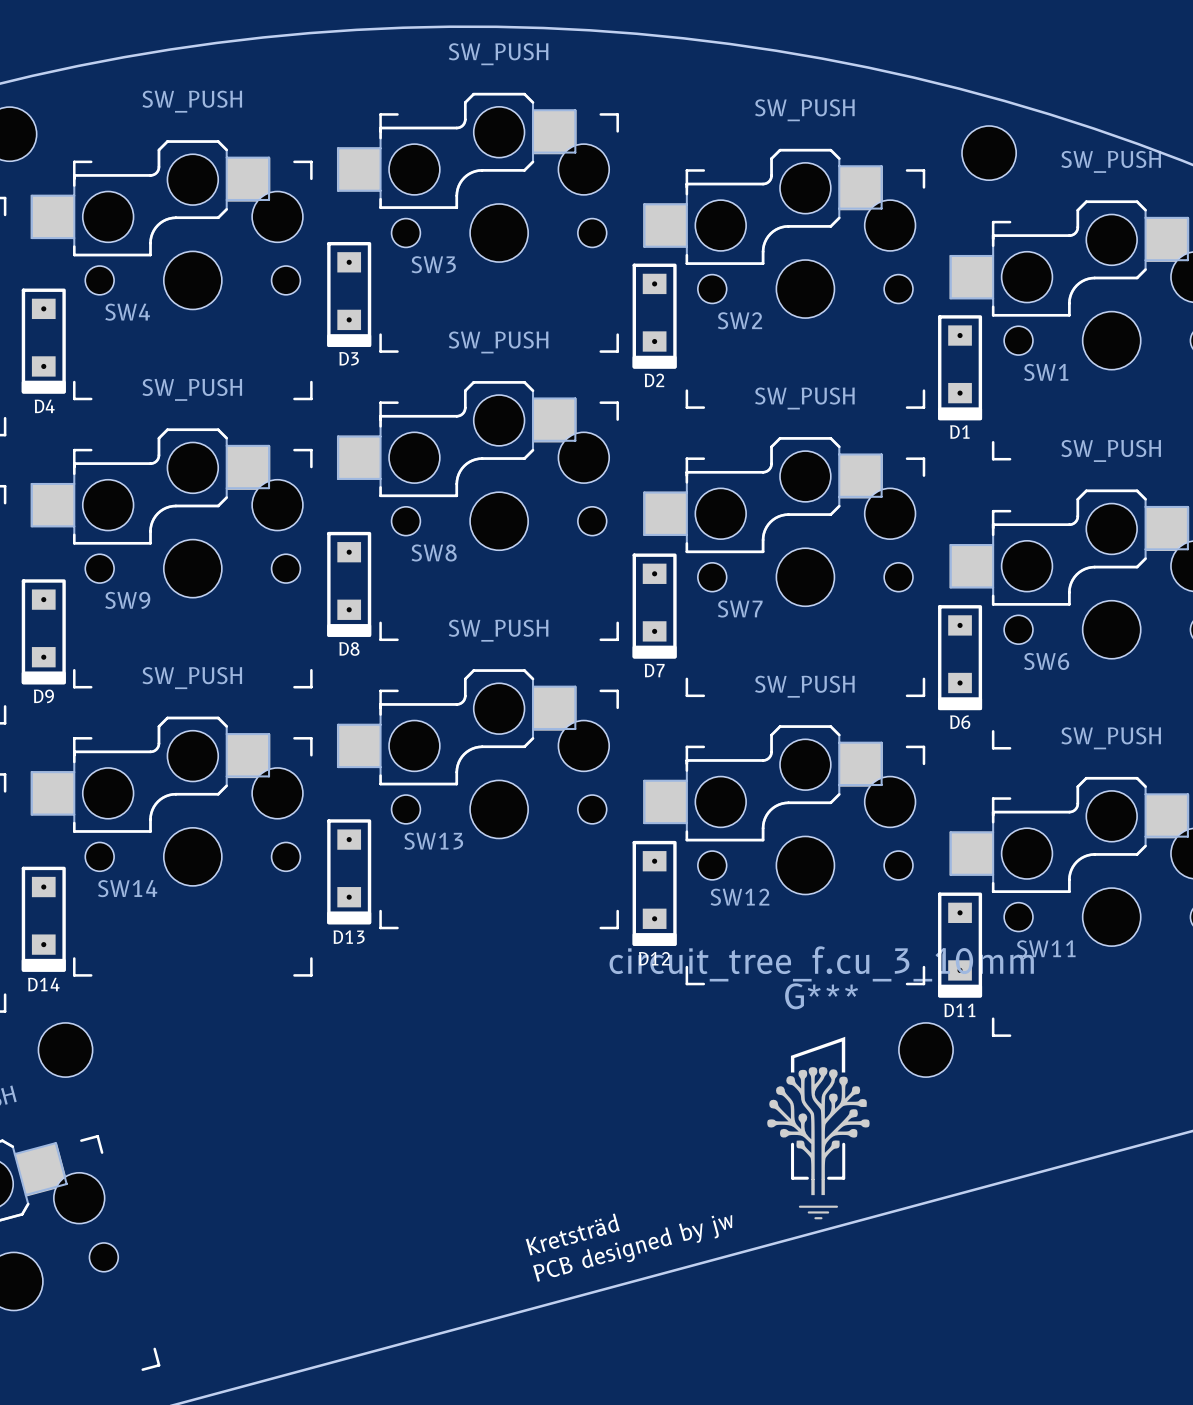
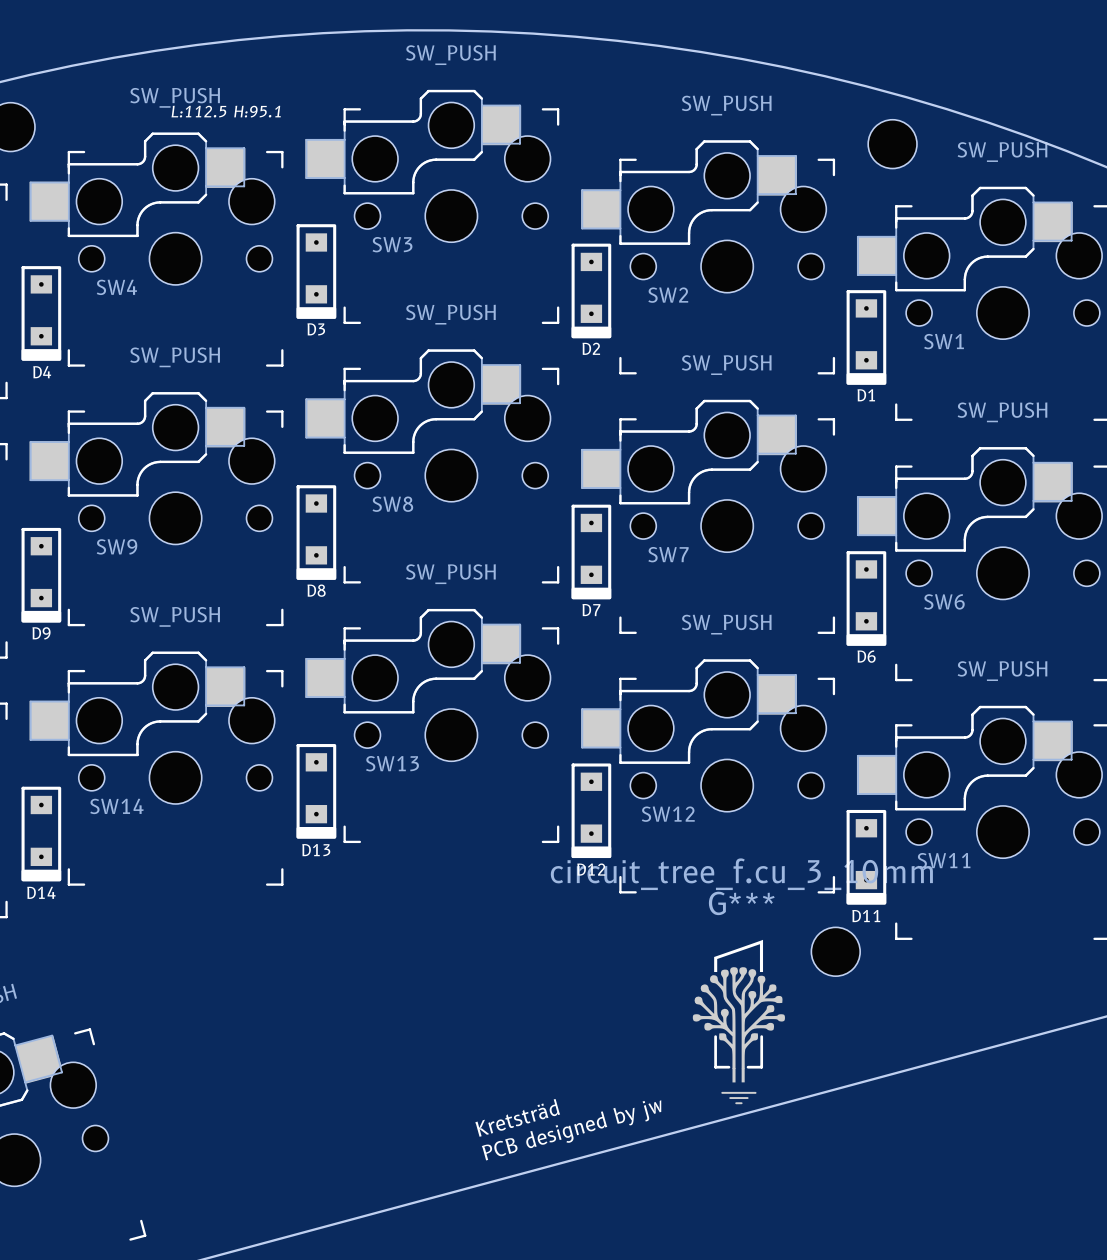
text: none -> L:112.5 H:95.1 (226, 111)
part: (65, 1050) -> none

